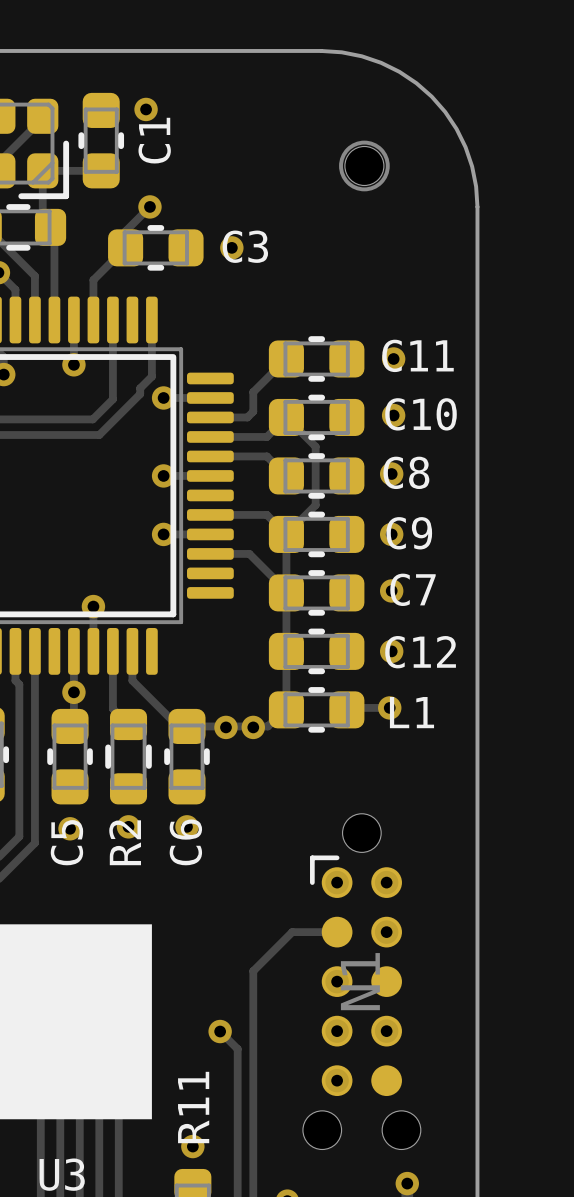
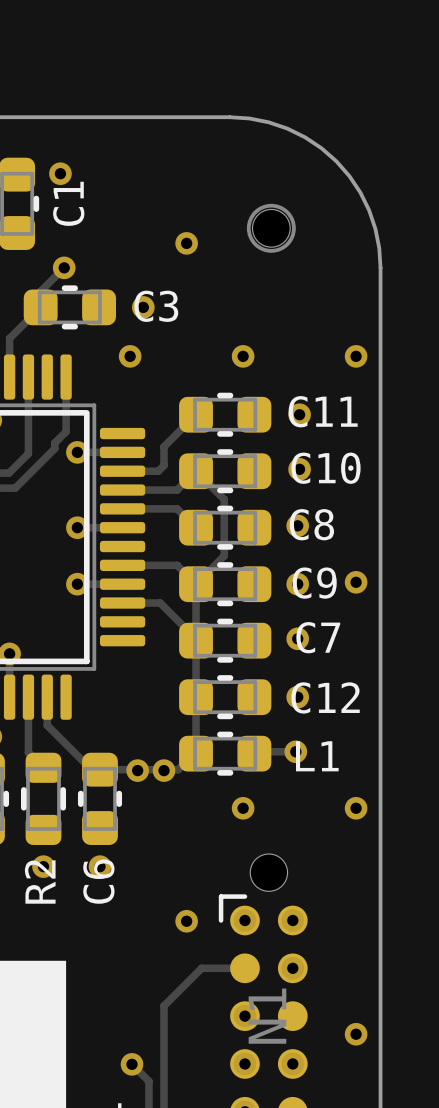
via: none -> (186, 243)
via: none -> (130, 356)
via: none -> (243, 356)
via: none -> (356, 356)
via: none -> (356, 582)
via: none -> (243, 808)
via: none -> (356, 808)
via: none -> (186, 921)
via: none -> (356, 1034)

